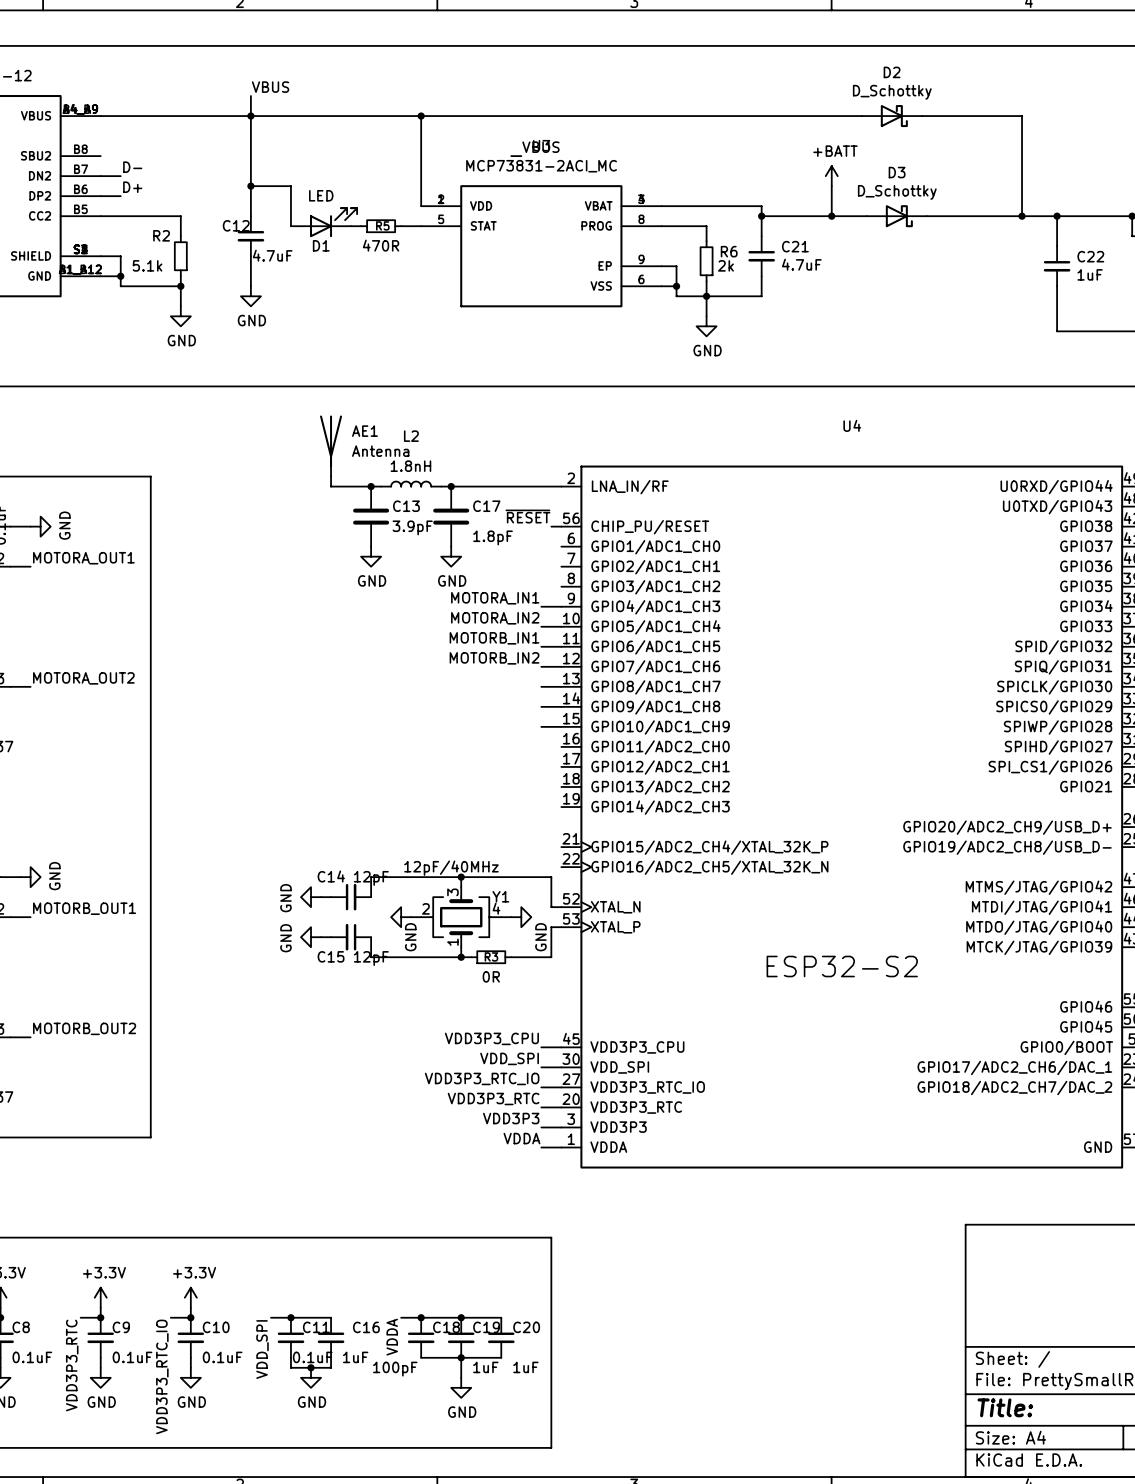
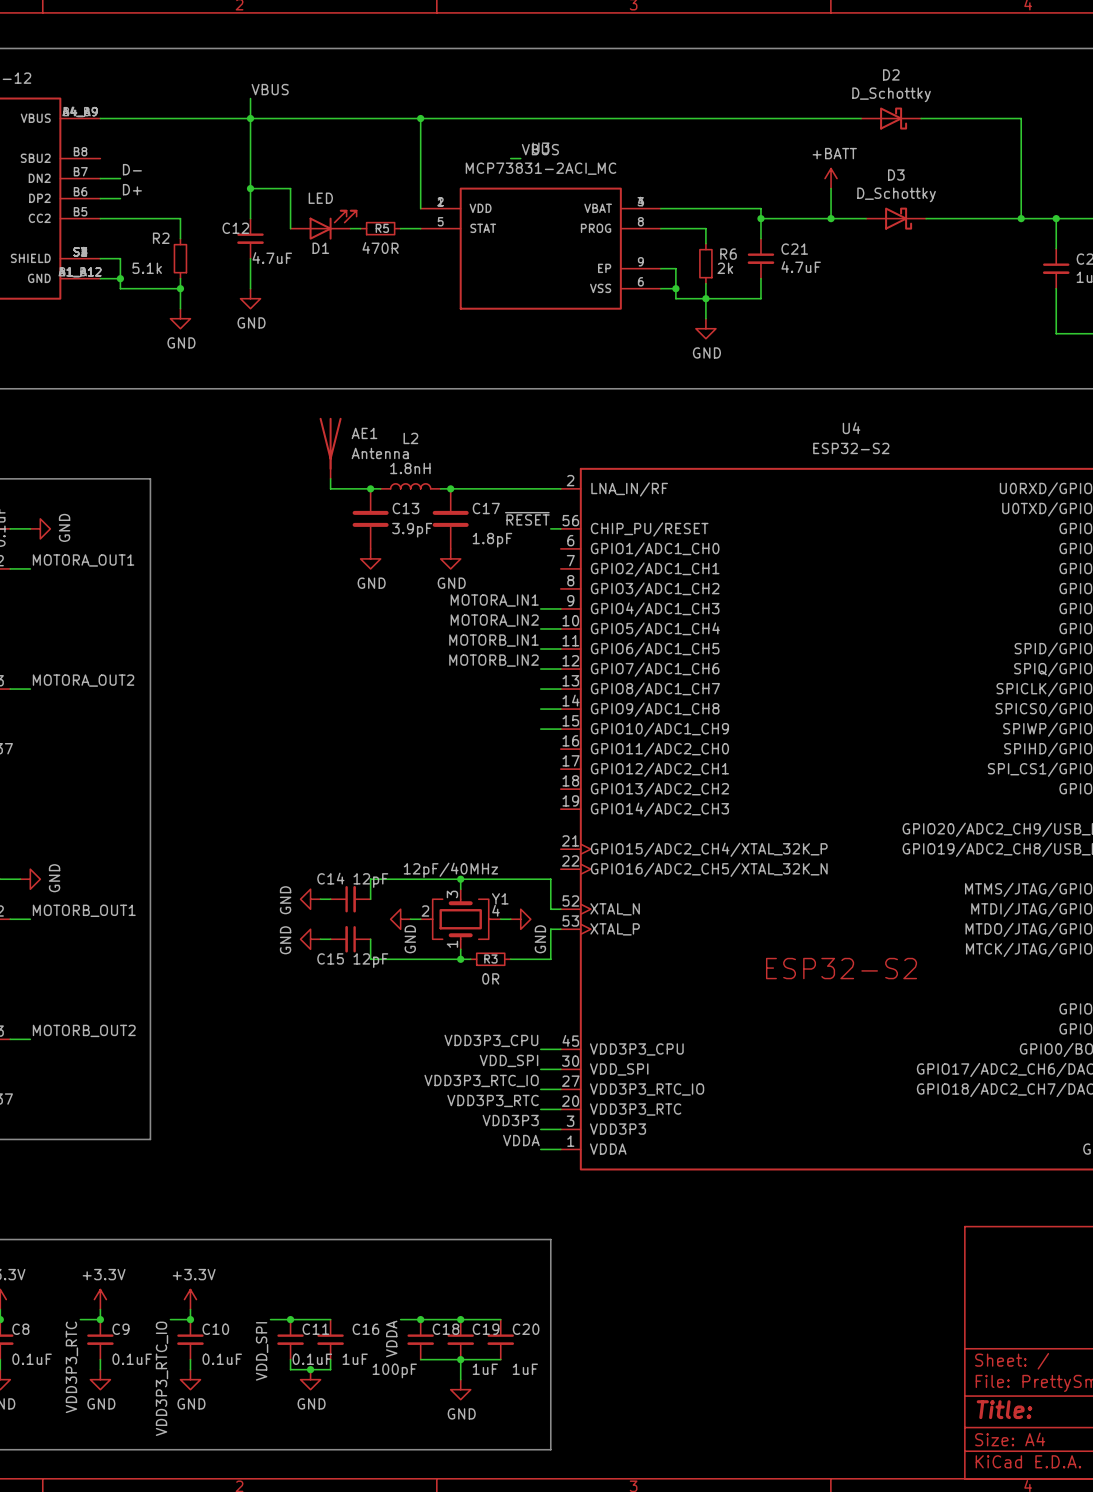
U4 value: none -> ESP32-S2 (851, 448)

